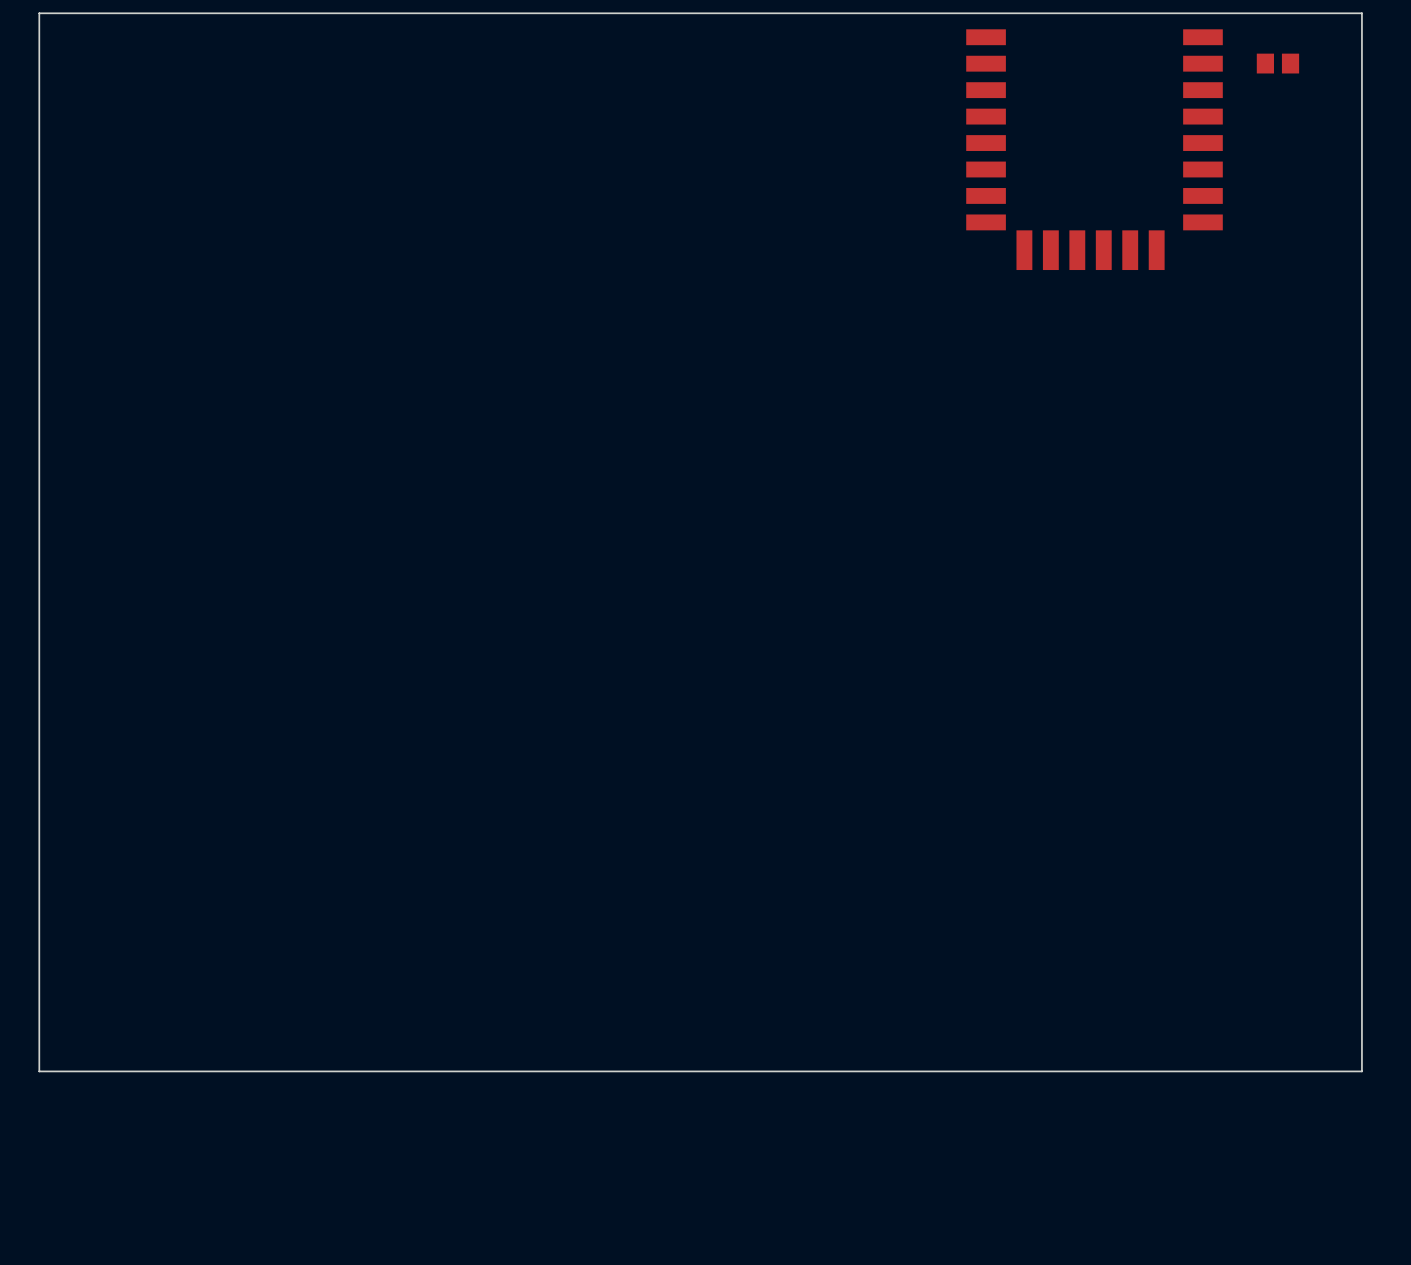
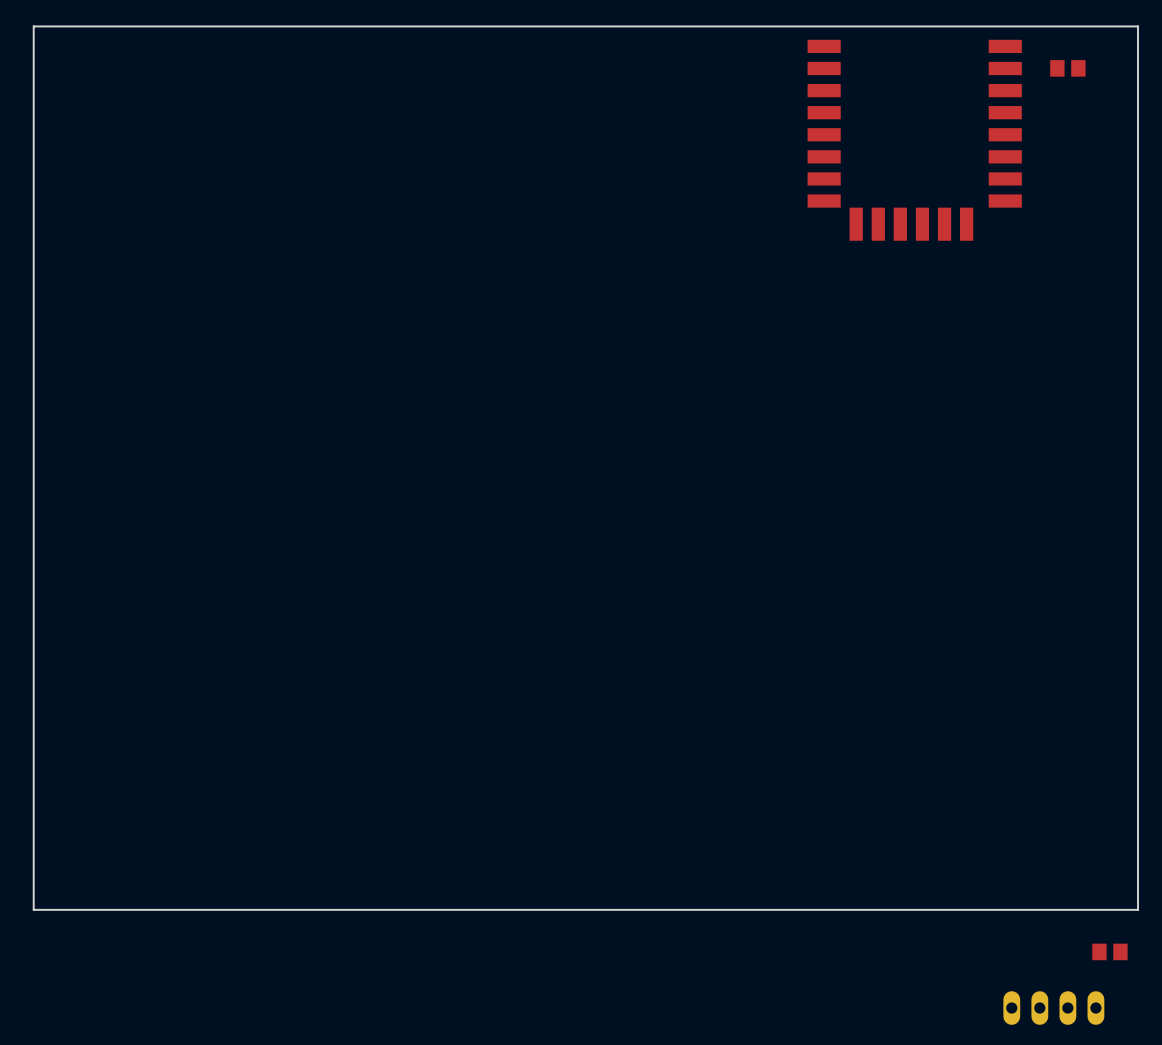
part: none -> (1109, 951)
part: none -> (1053, 1008)

